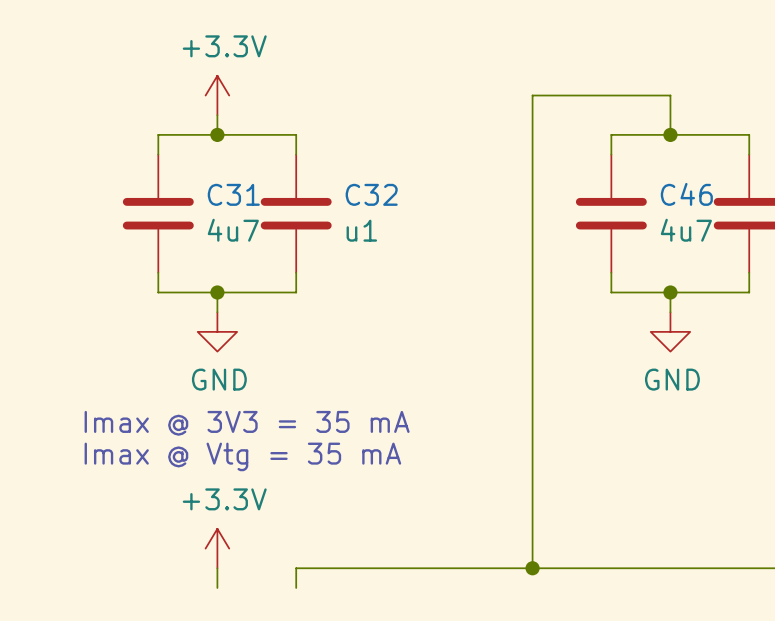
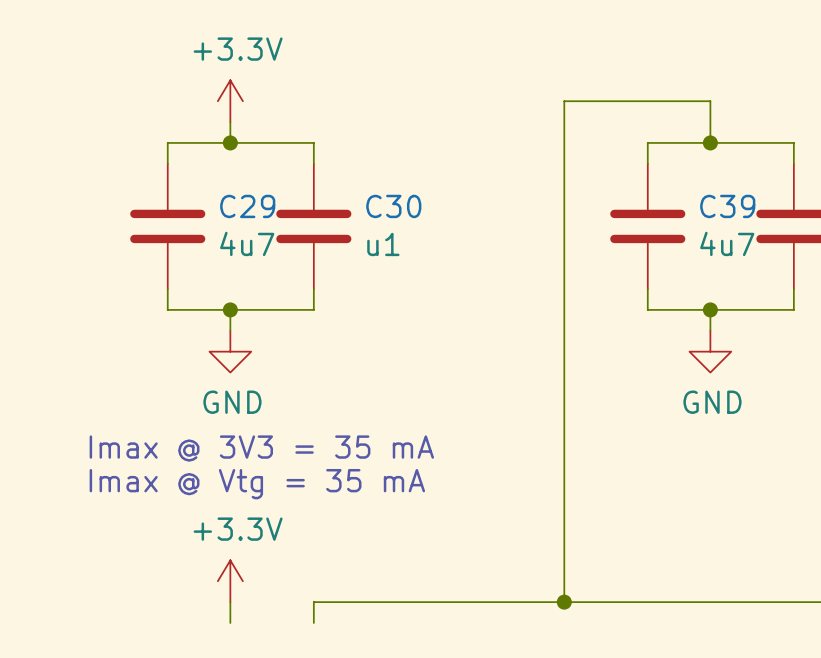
C31 name: C31 (233, 194) -> C29 (247, 206)
C32 name: C32 (371, 194) -> C30 (393, 206)
C46 name: C46 (686, 194) -> C39 (727, 206)

